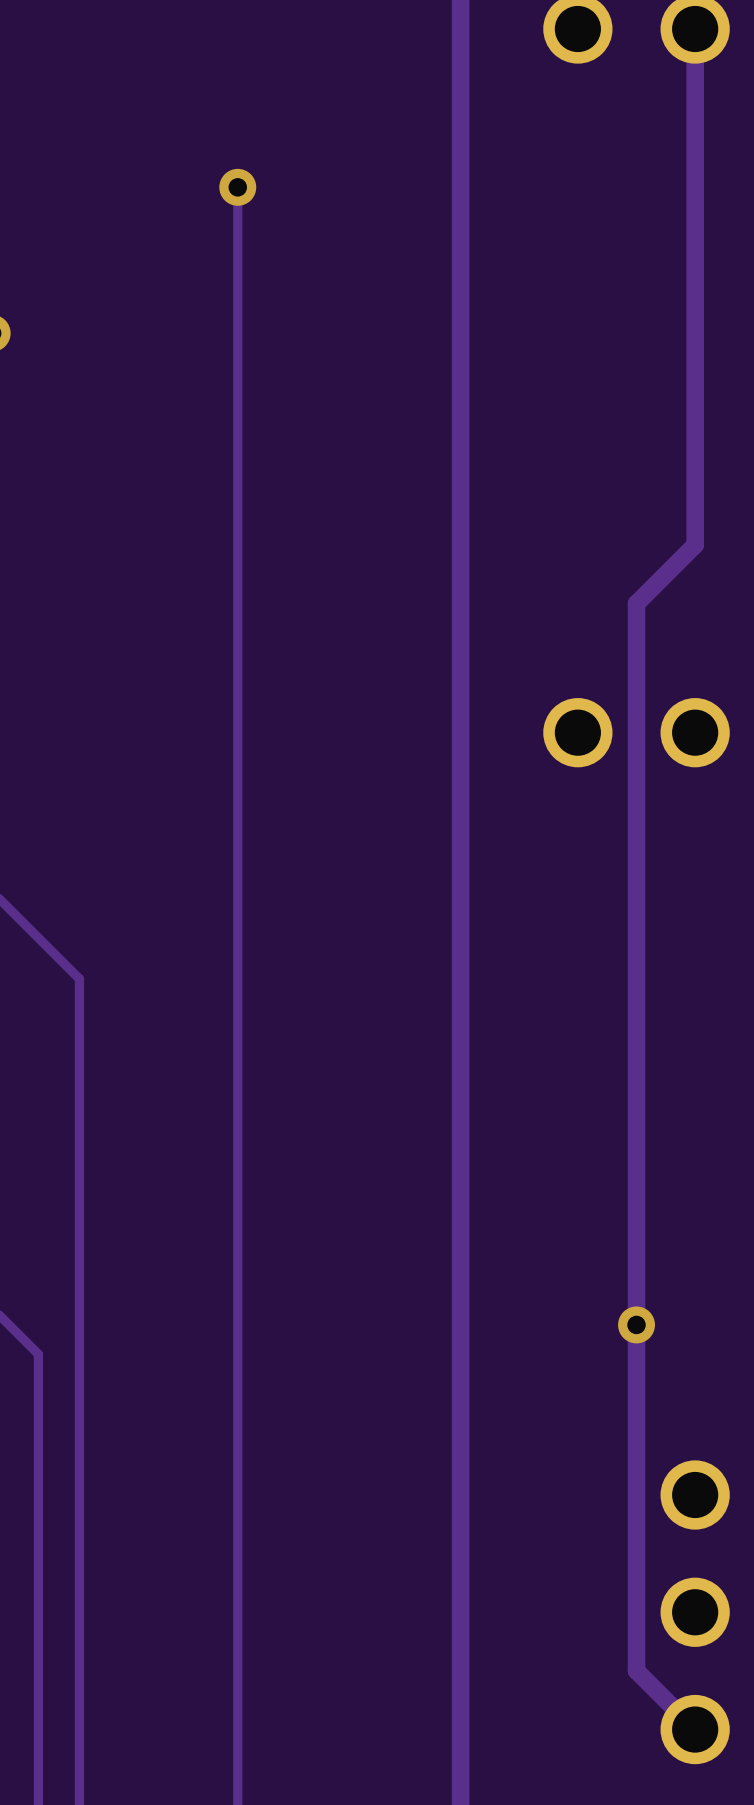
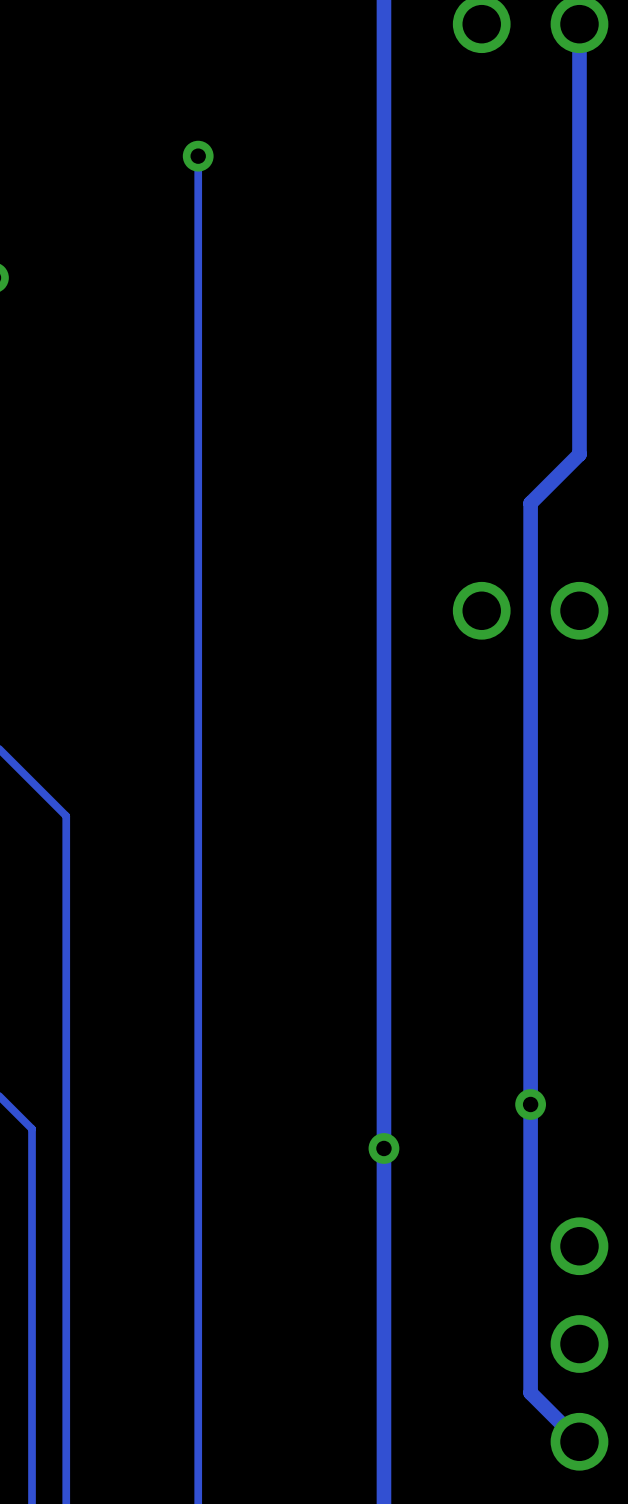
via: none -> (383, 1148)

